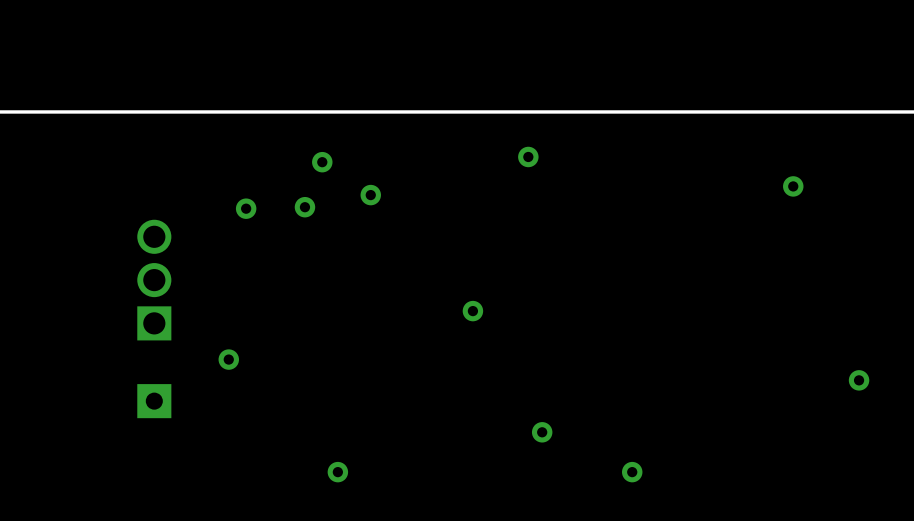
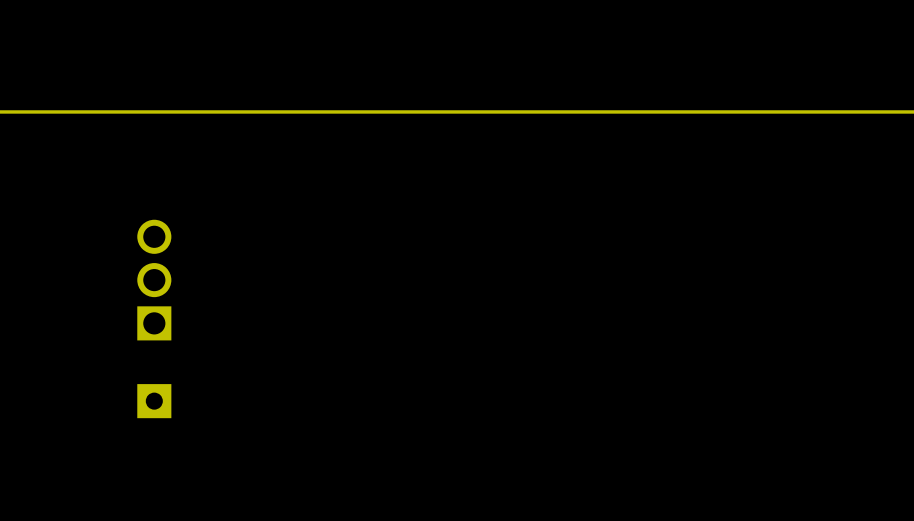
via: (528, 156) -> none
via: (322, 162) -> none
via: (793, 186) -> none
via: (370, 195) -> none
via: (304, 207) -> none
via: (246, 208) -> none
via: (472, 311) -> none
via: (228, 359) -> none
via: (859, 380) -> none
via: (542, 432) -> none
via: (337, 472) -> none
via: (632, 472) -> none

